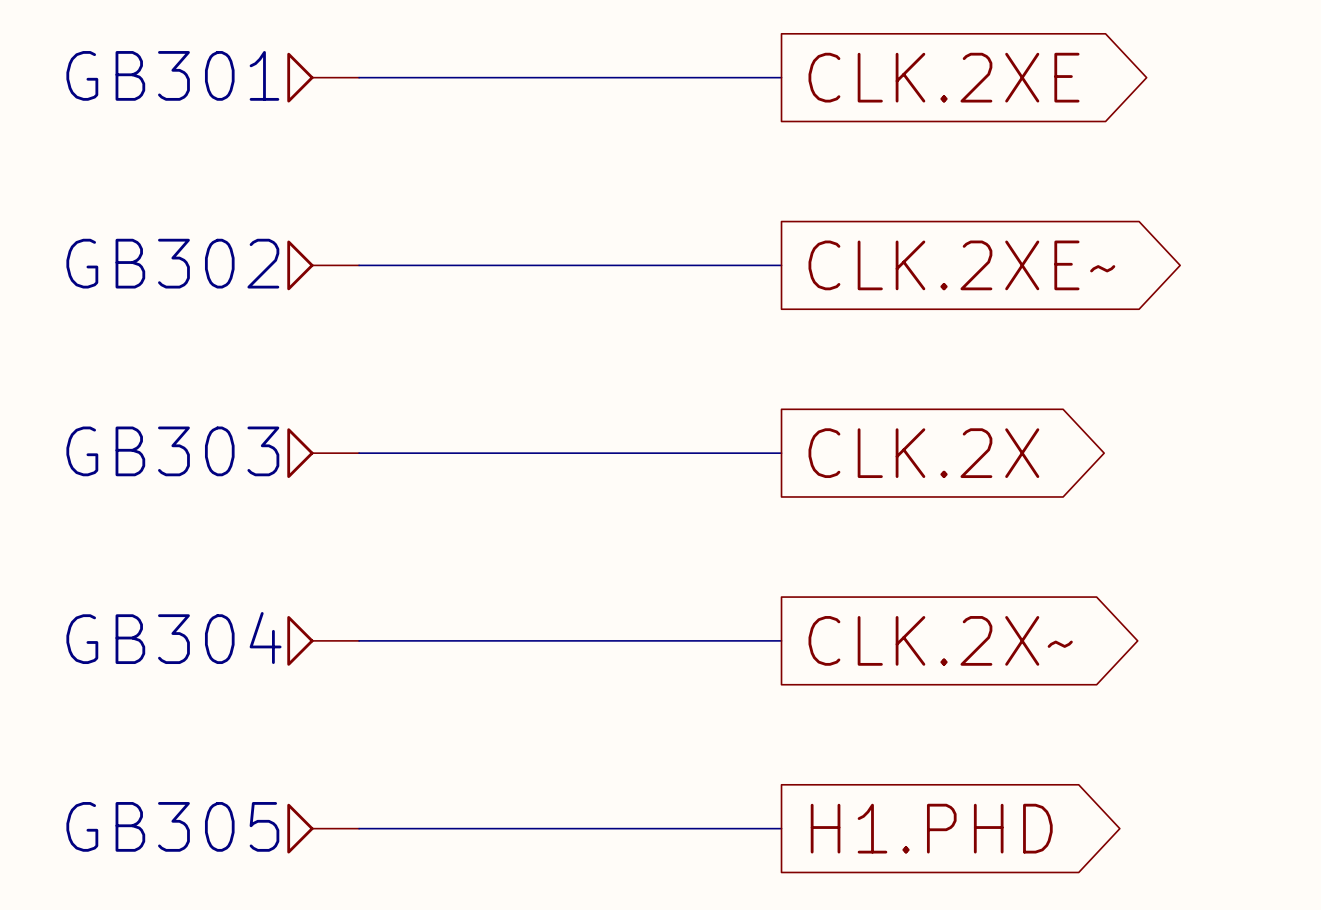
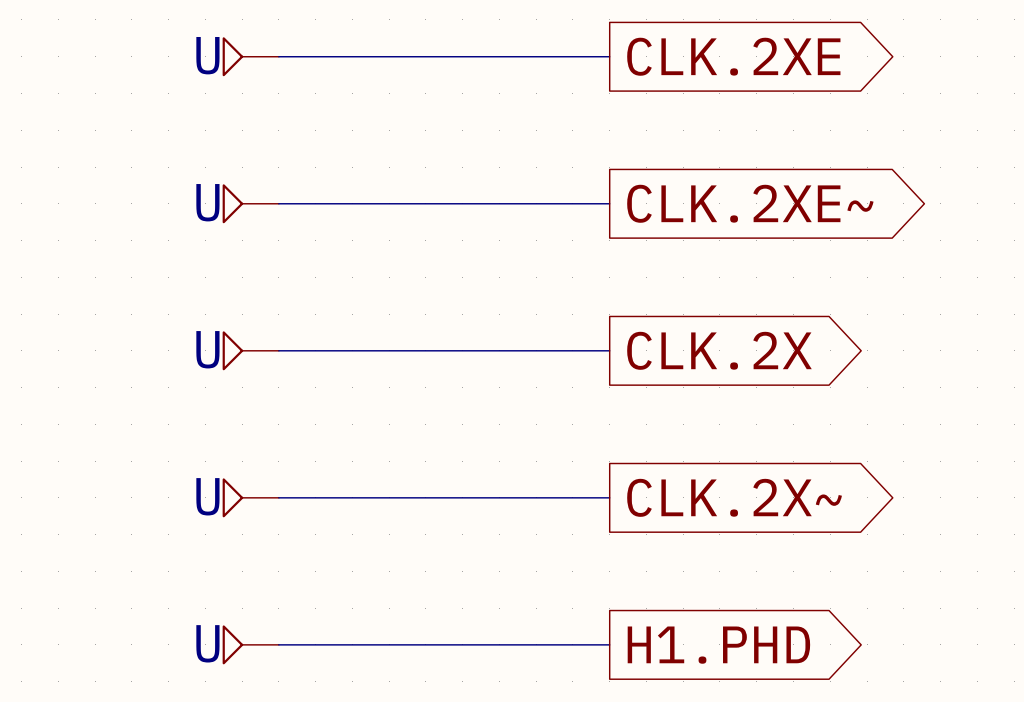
GB301 name: GB301 (172, 75) -> U (207, 55)
GB302 name: GB302 (172, 263) -> U (207, 202)
GB303 name: GB303 (172, 451) -> U (207, 349)
GB304 name: GB304 (173, 638) -> U (207, 496)
GB305 name: GB305 (172, 826) -> U (207, 643)

